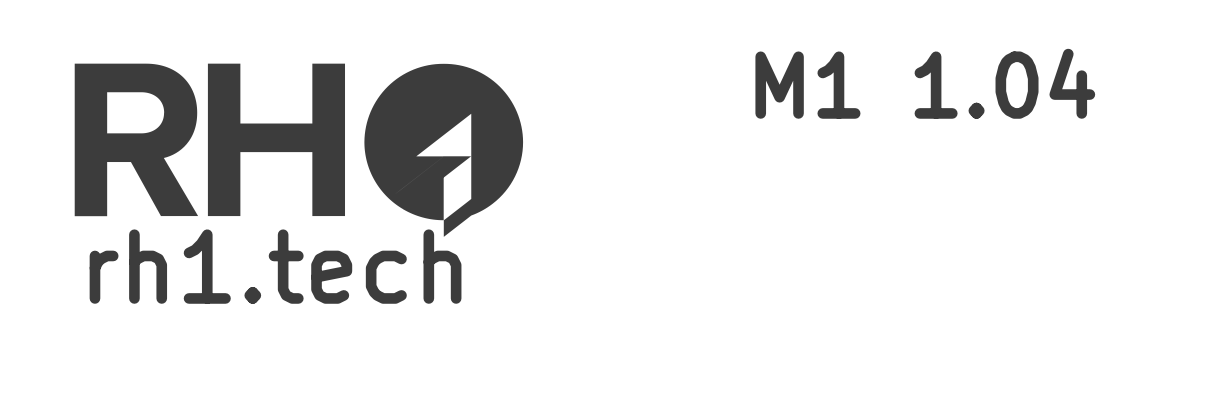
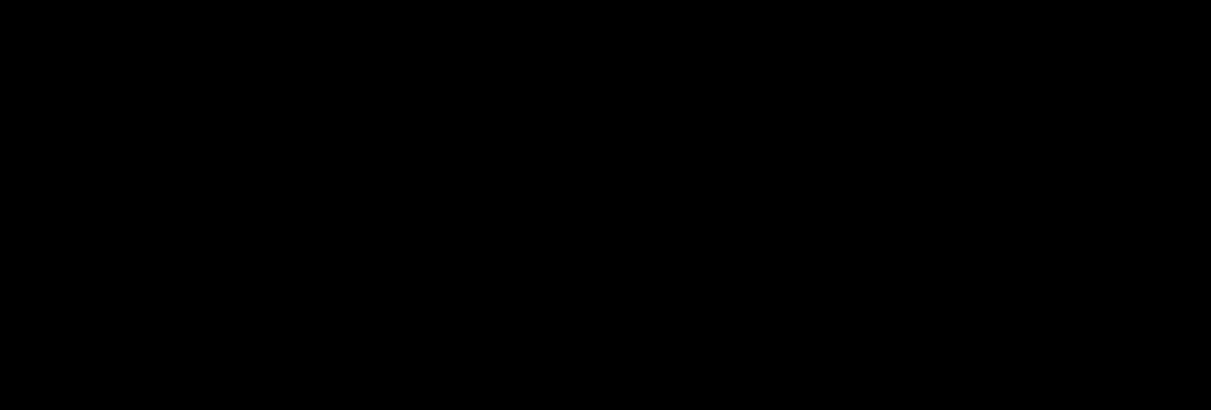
drawing: [74, 63, 524, 237] -> none
text: M1 1.04 (925, 83) -> none
text: rh1.tech (275, 266) -> none

